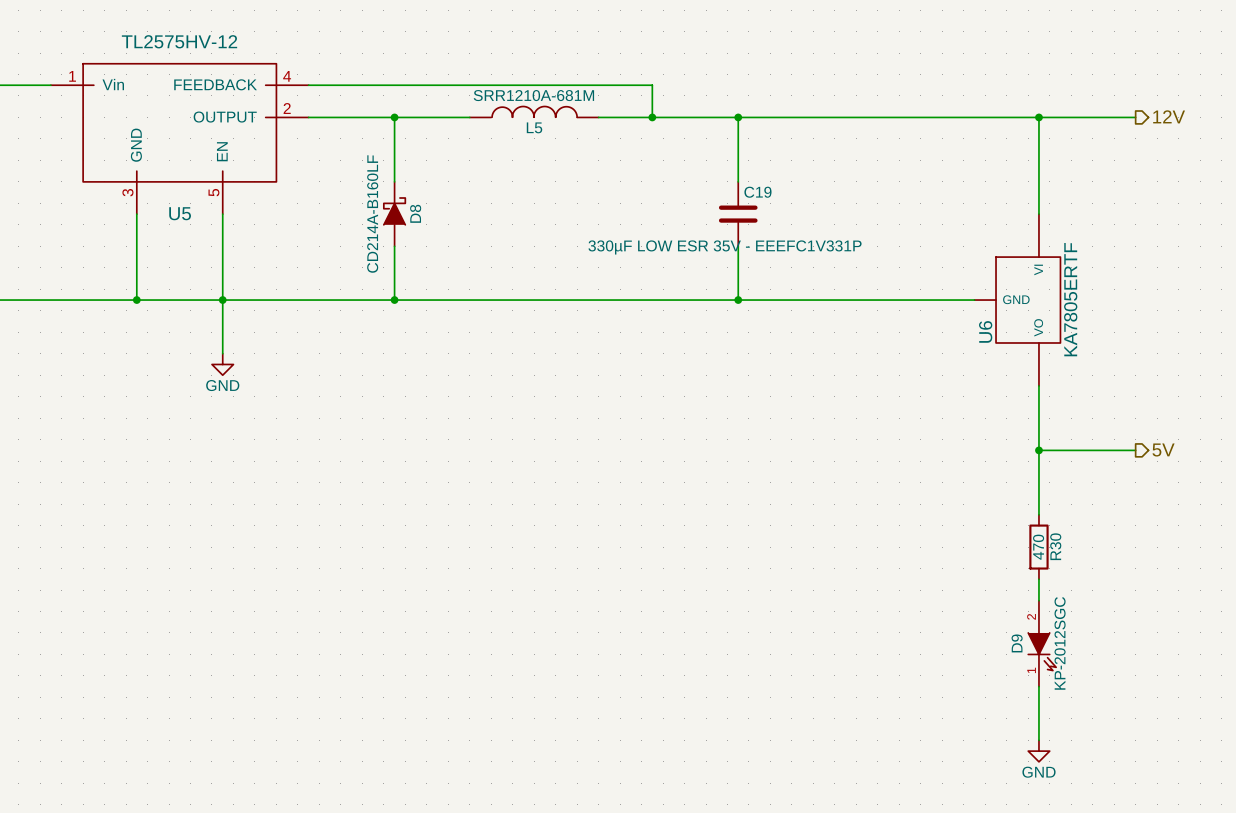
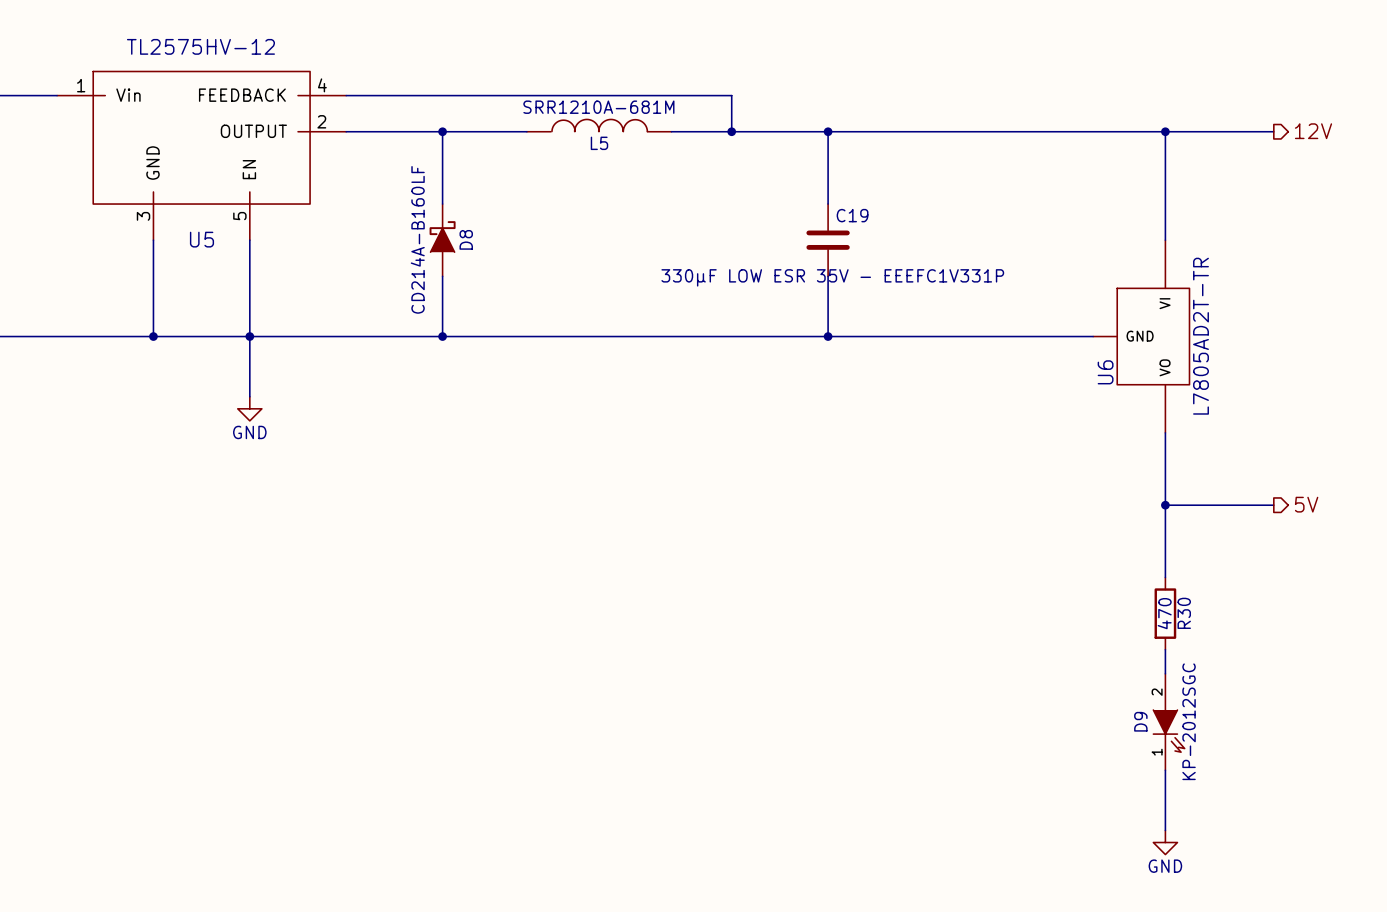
U6 value: KA7805ERTF (1070, 299) -> L7805AD2T-TR (1201, 336)

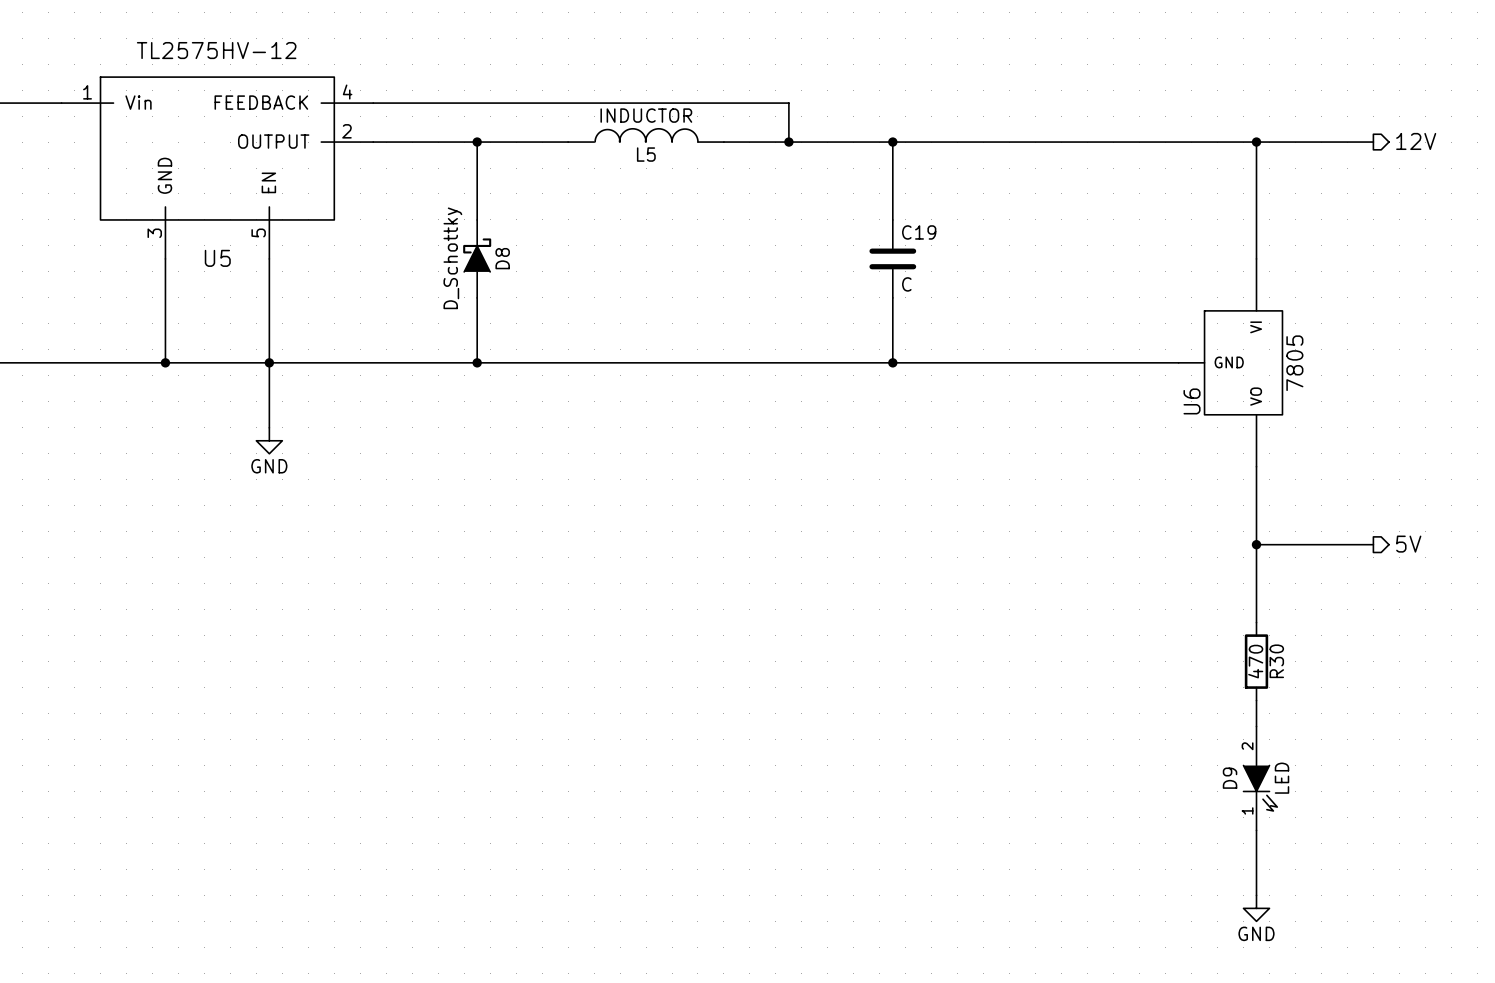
L5 value: SRR1210A-681M (598, 107) -> INDUCTOR (646, 115)
D8 value: CD214A-B160LF (417, 239) -> D_Schottky (452, 258)
C19 value: 330µF LOW ESR 35V - EEEFC1V331P (832, 277) -> C (906, 284)
U6 value: L7805AD2T-TR (1201, 336) -> 7805 (1294, 363)
D9 value: KP-2012SGC (1189, 721) -> LED (1281, 778)

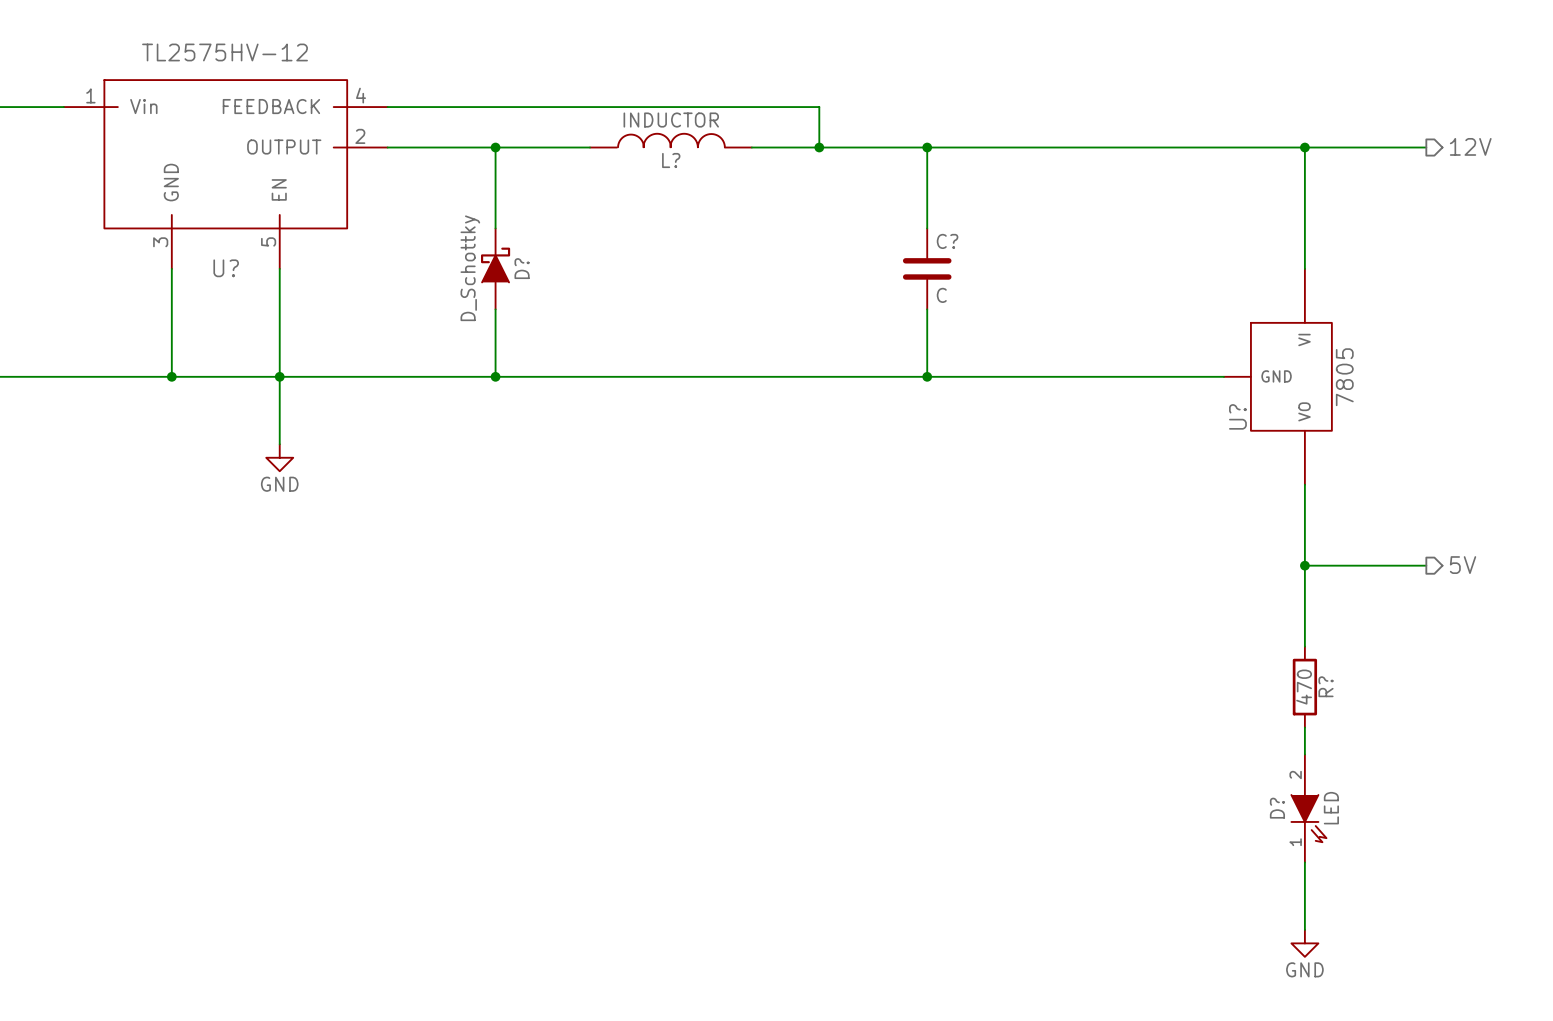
L5 name: L5 (646, 154) -> L? (671, 160)
C19 name: C19 (919, 232) -> C? (947, 241)
U5 name: U5 (217, 258) -> U? (226, 268)
D8 name: D8 (502, 258) -> D? (522, 268)
U6 name: U6 (1192, 401) -> U? (1237, 416)
R30 name: R30 (1276, 661) -> R? (1325, 686)
D9 name: D9 (1230, 778) -> D? (1277, 808)

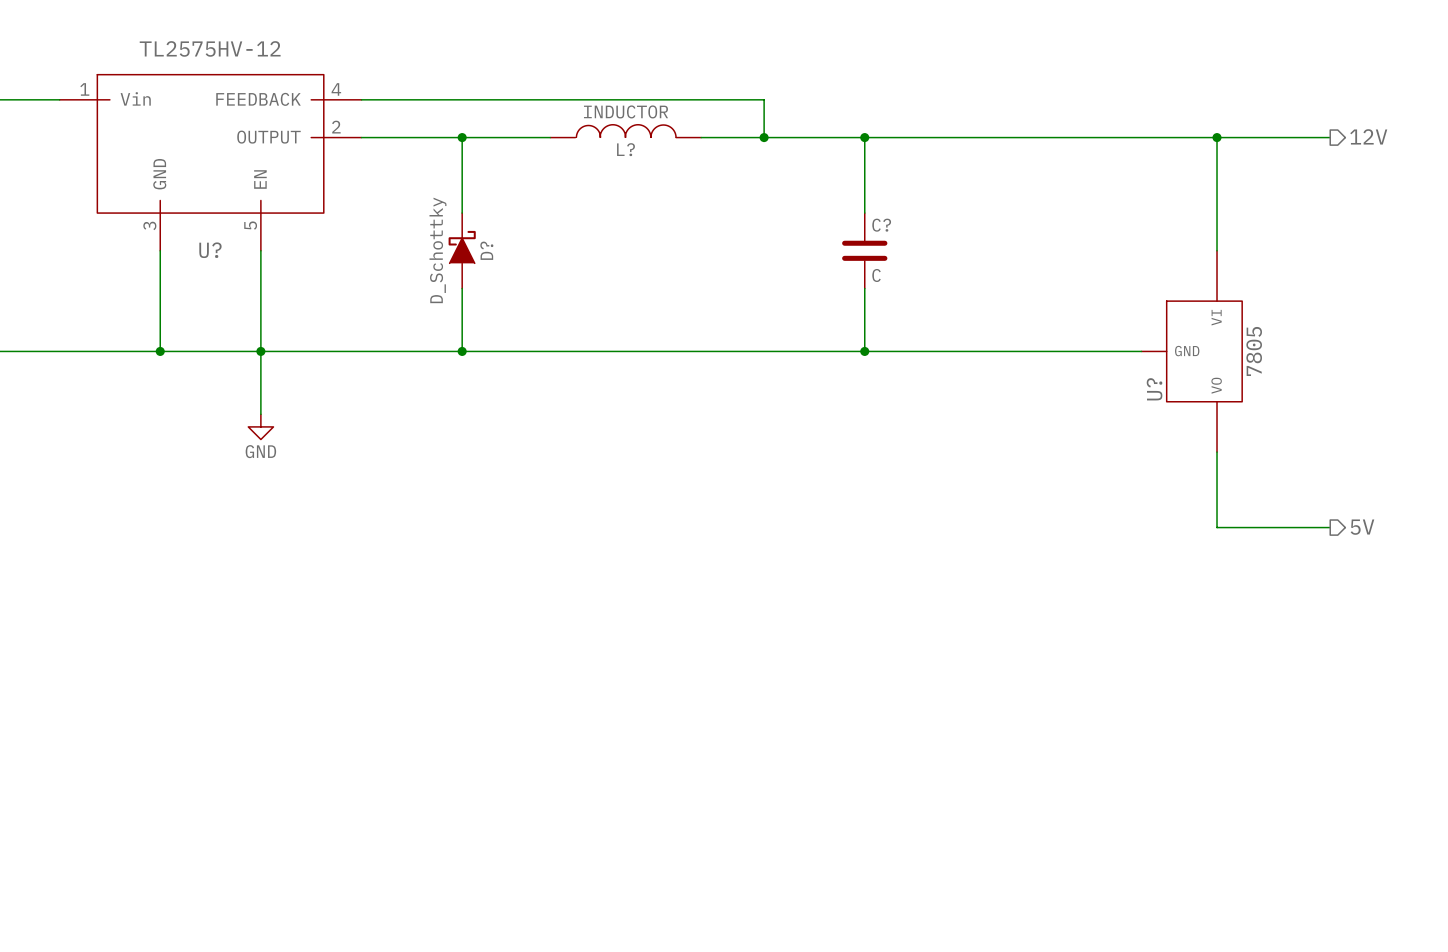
wire: (1304, 565) (1304, 646) -> none
junction: (1304, 565) -> none
R?: 470 (1304, 687) -> none
wire: (1304, 727) (1304, 754) -> none
D?: LED (1308, 808) -> none
wire: (1304, 862) (1304, 929) -> none
power symbol: GND (1304, 943) -> none

